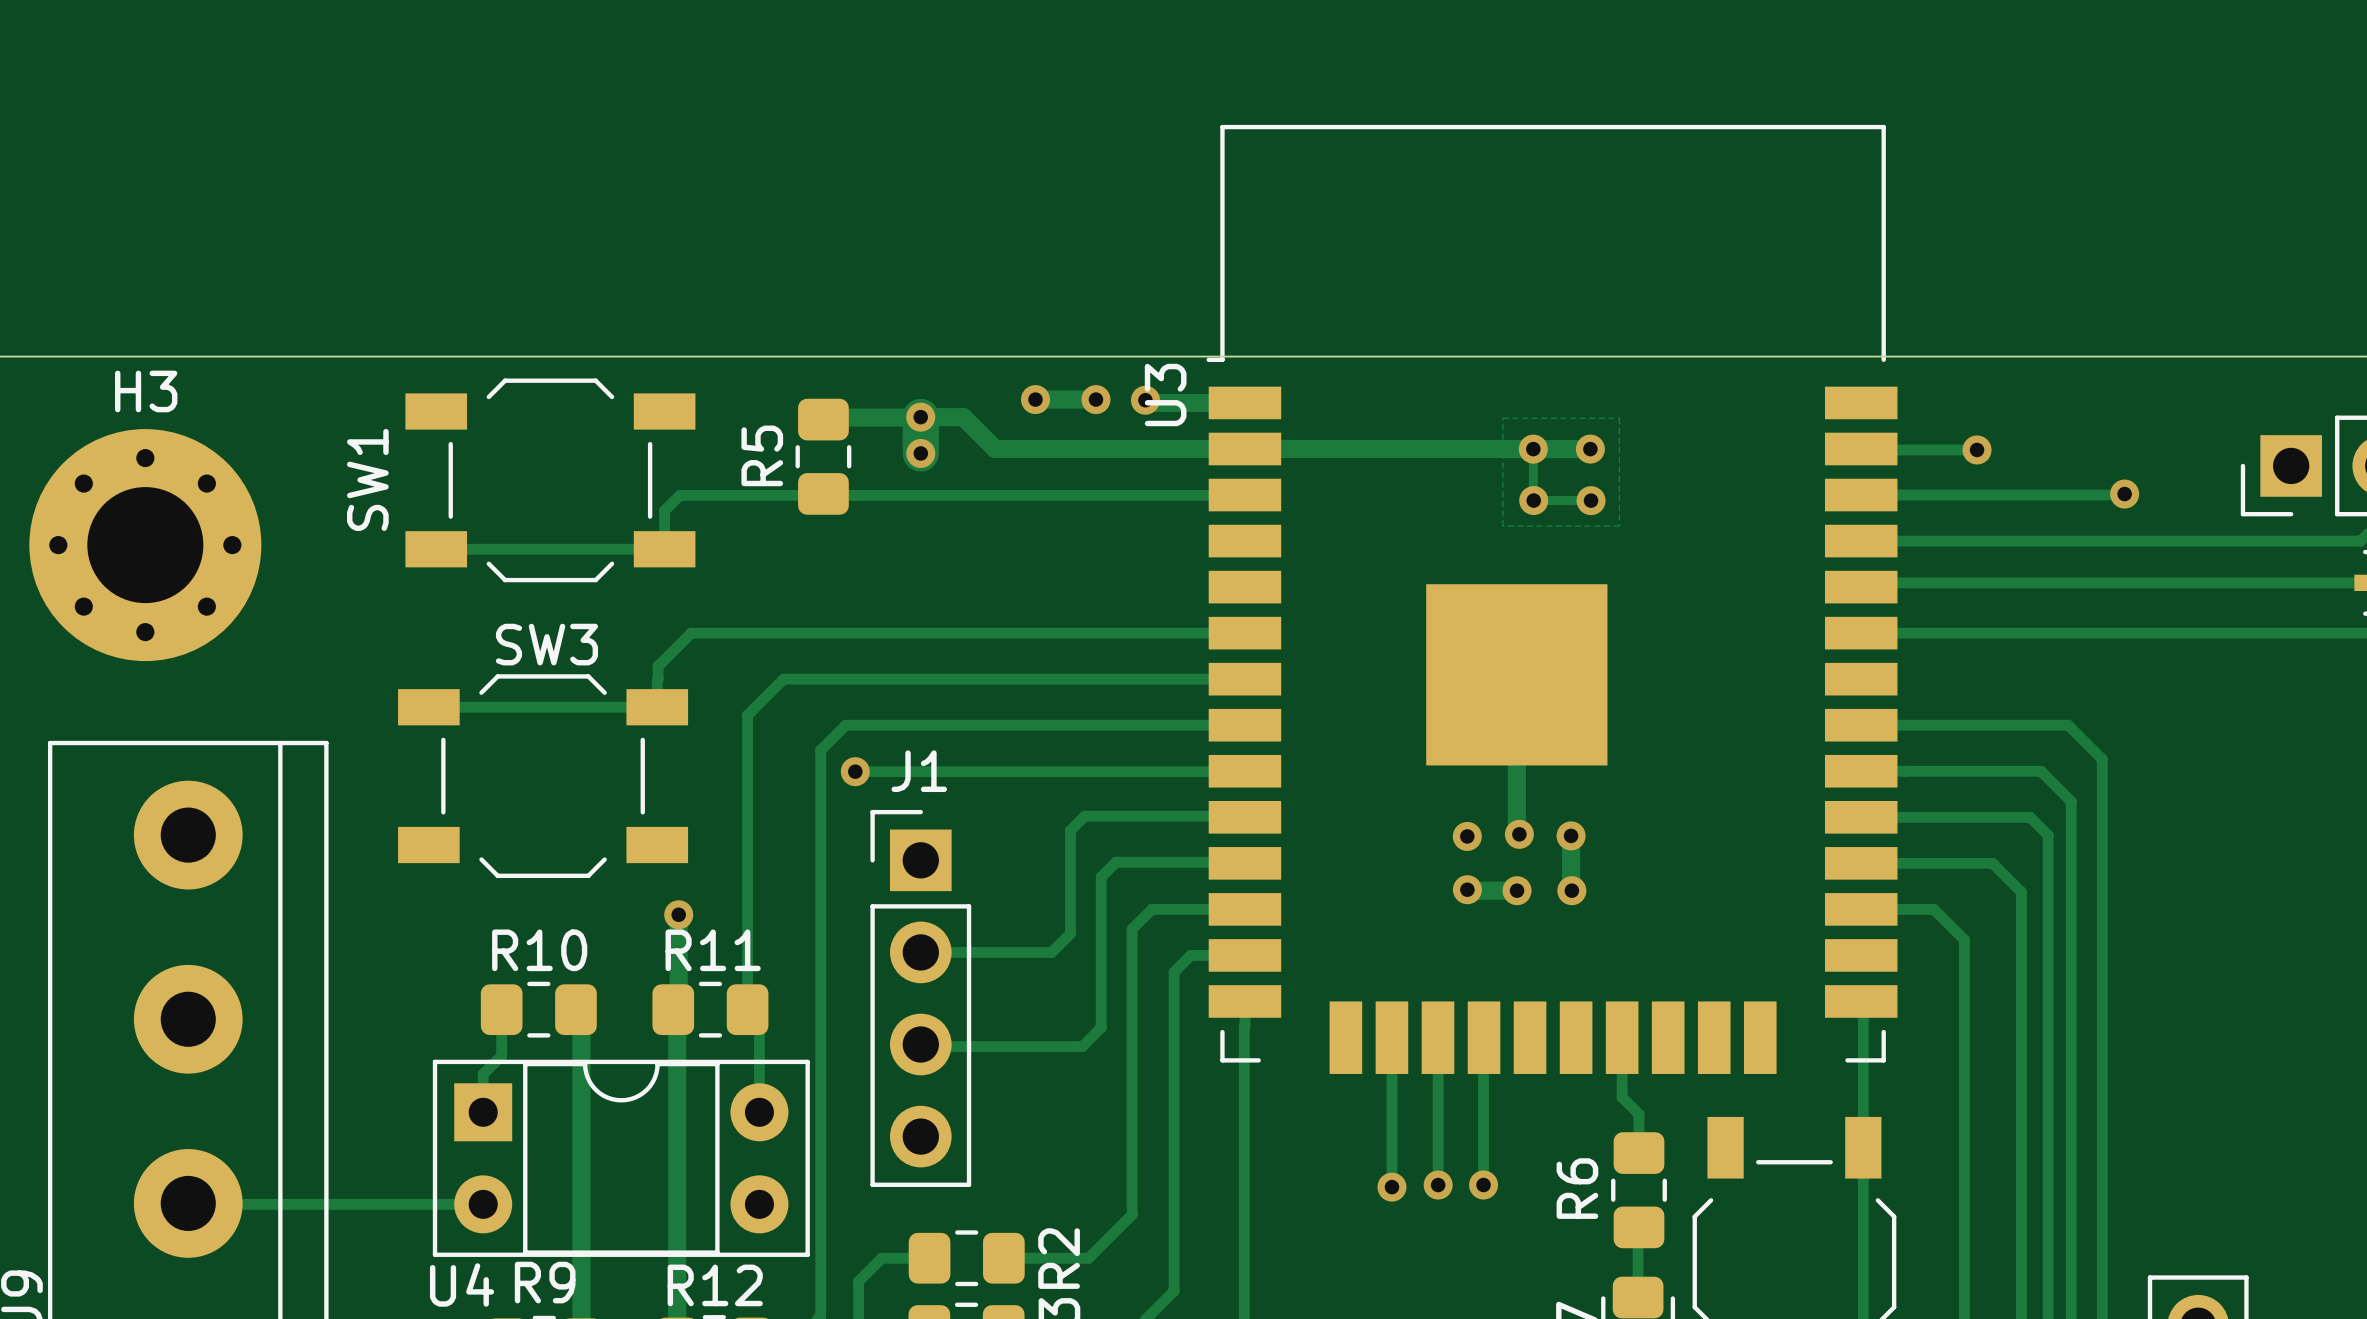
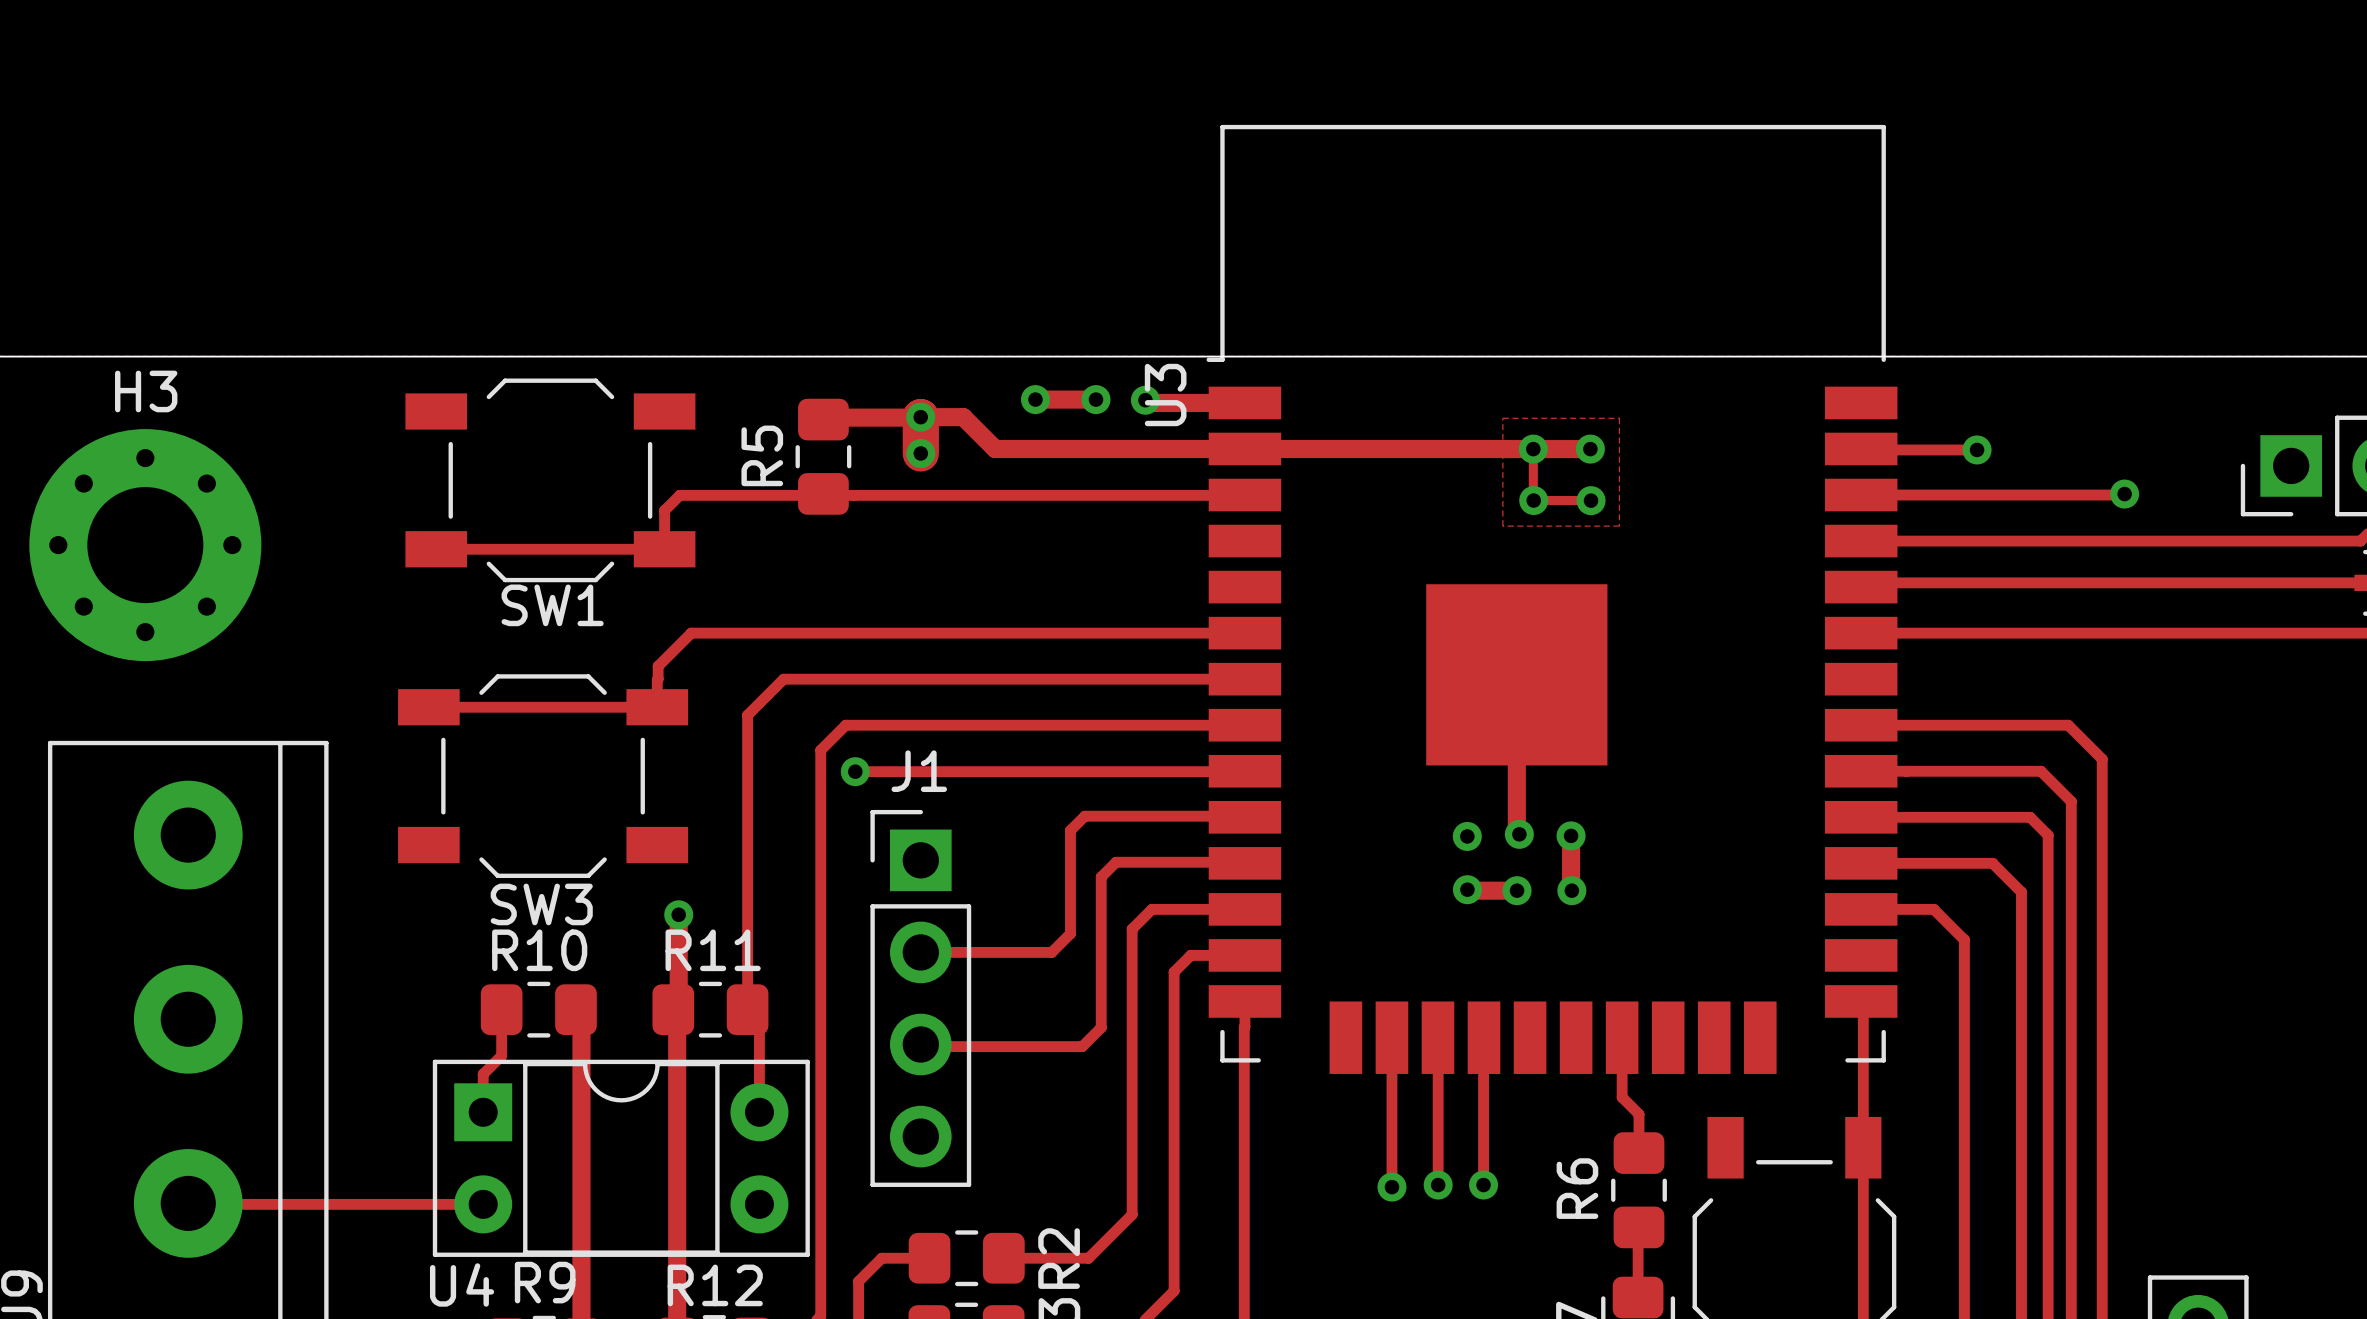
SW1 name rotation: 0° (367, 479) -> 90° clockwise (552, 605)
SW1 name position: SW1 (367, 479) -> SW1 (552, 605)
SW3 name position: SW3 (546, 644) -> SW3 (541, 904)

